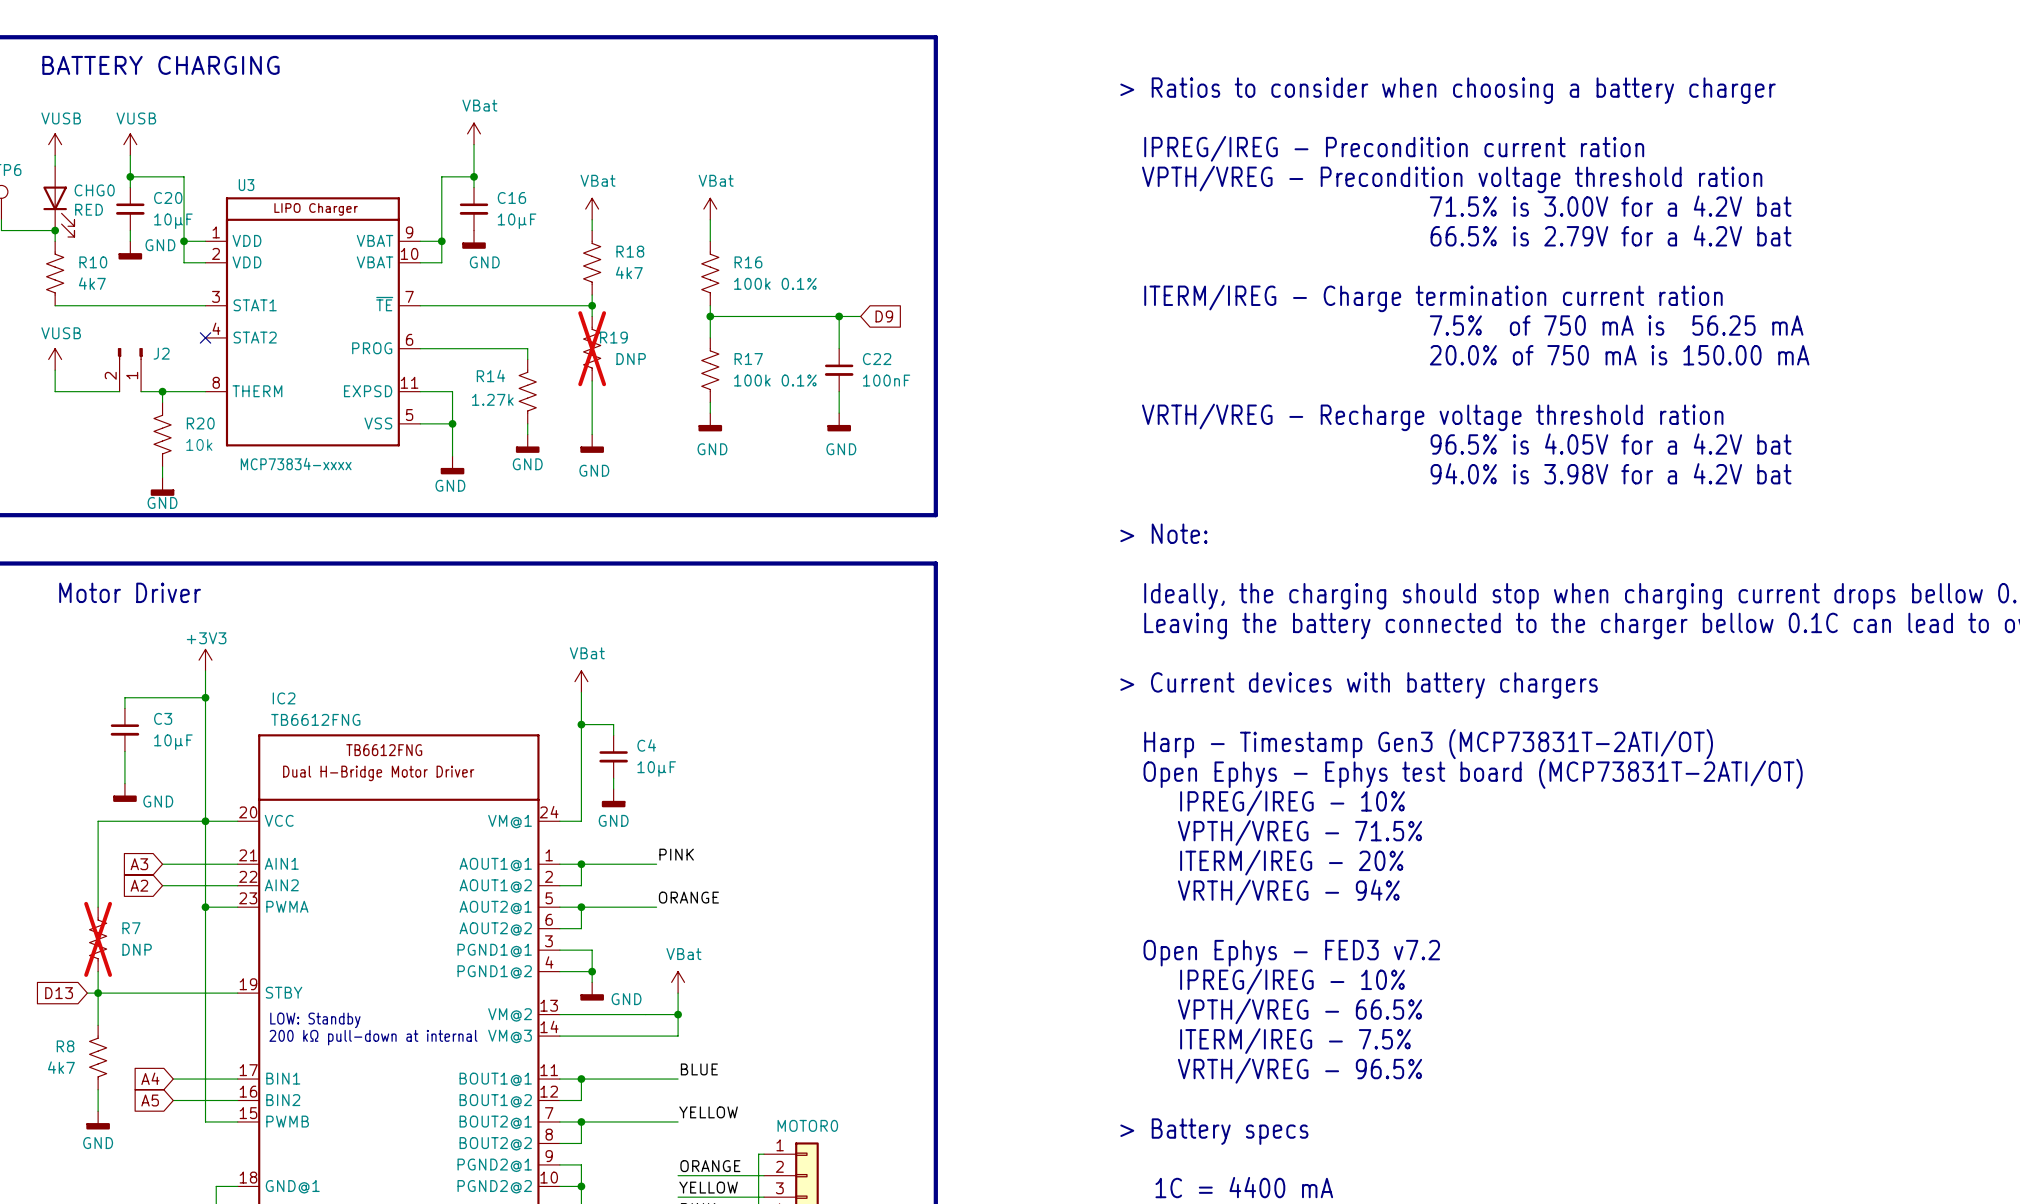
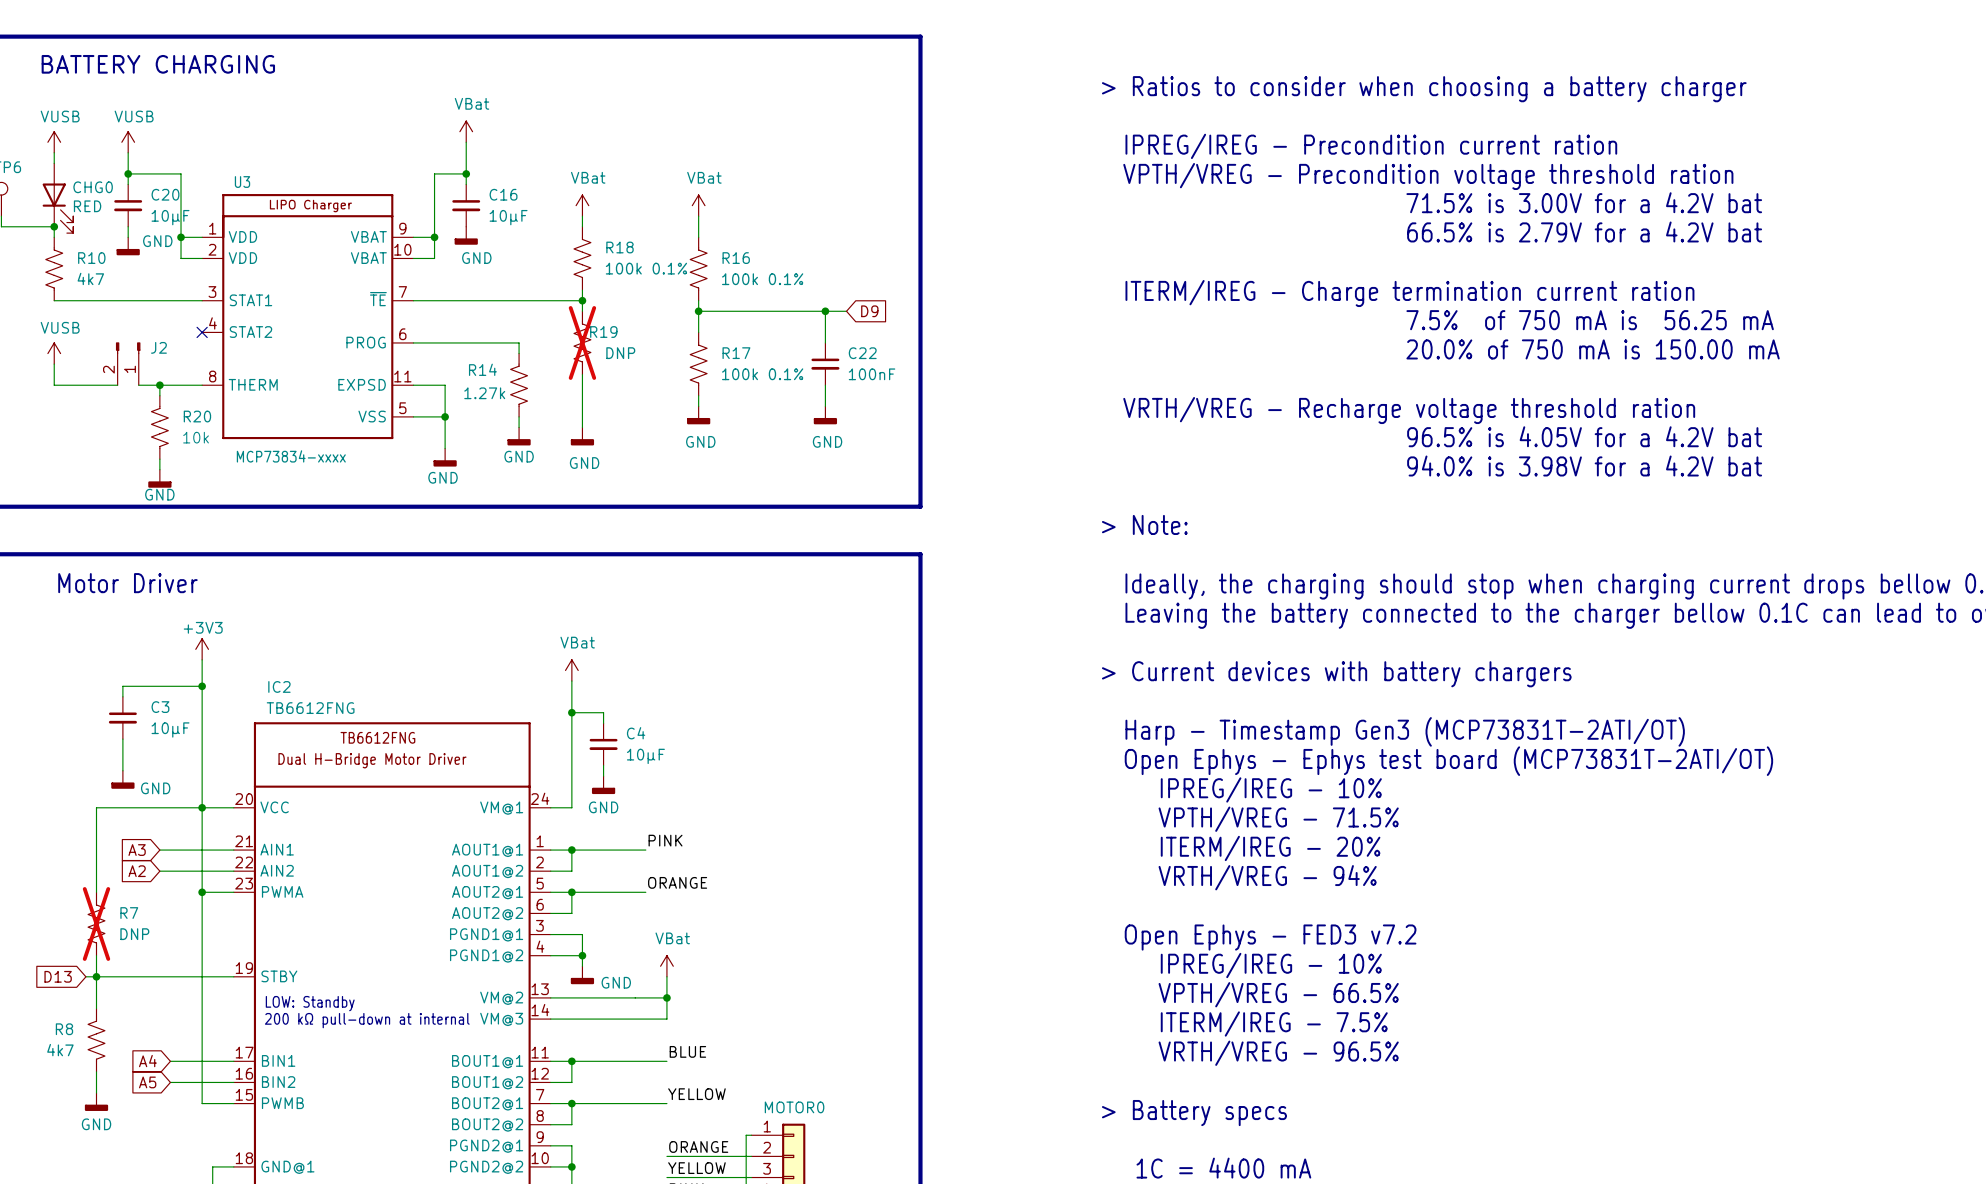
R18 value: 4k7 (629, 272) -> 100k 0.1% (646, 268)

